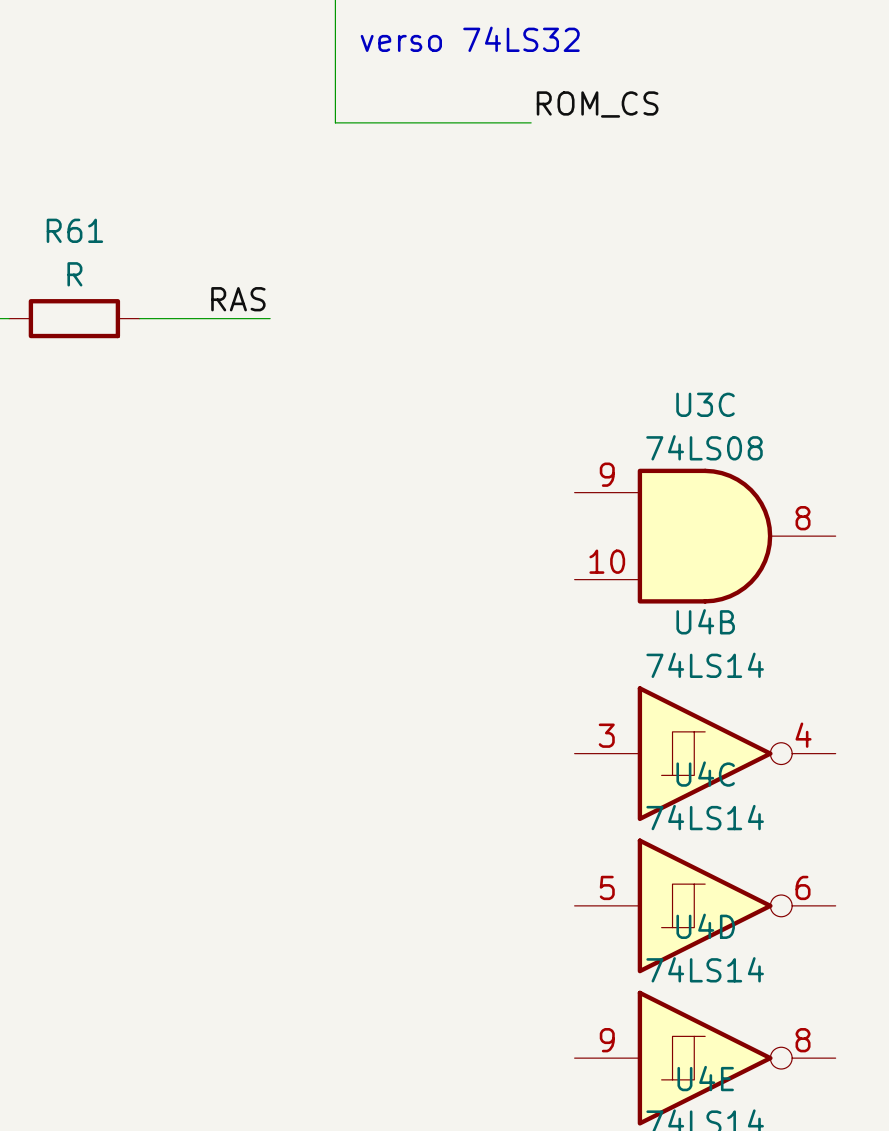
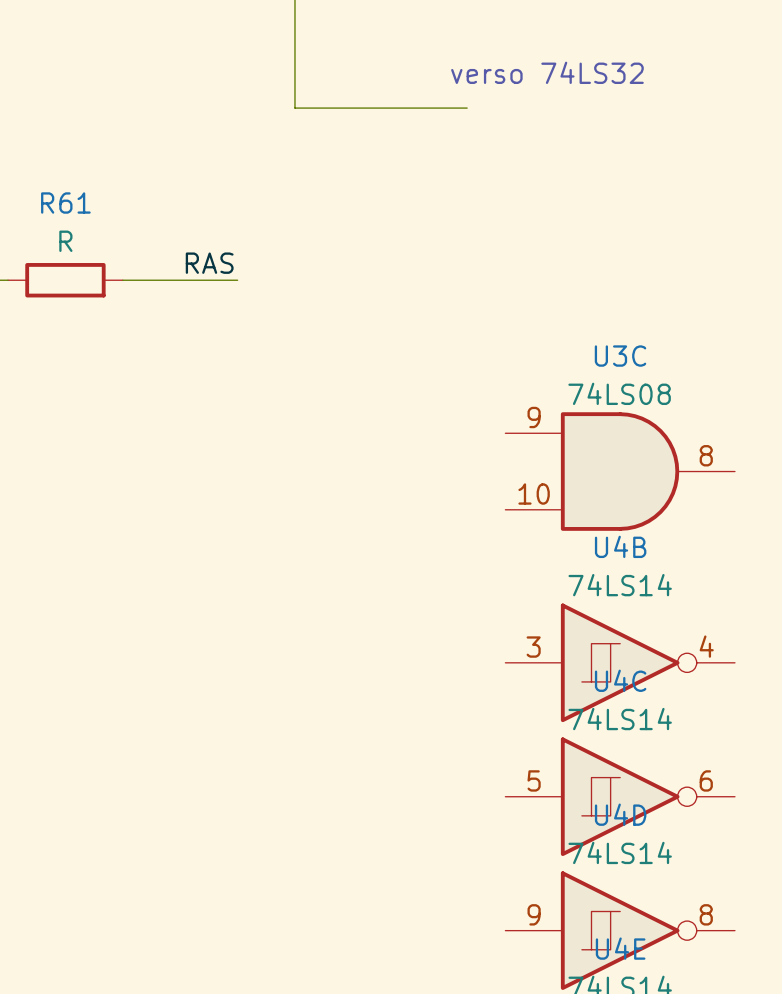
text position: verso 74LS32 (470, 39) -> verso 74LS32 (547, 72)
label: ROM_CS (597, 104) -> none

